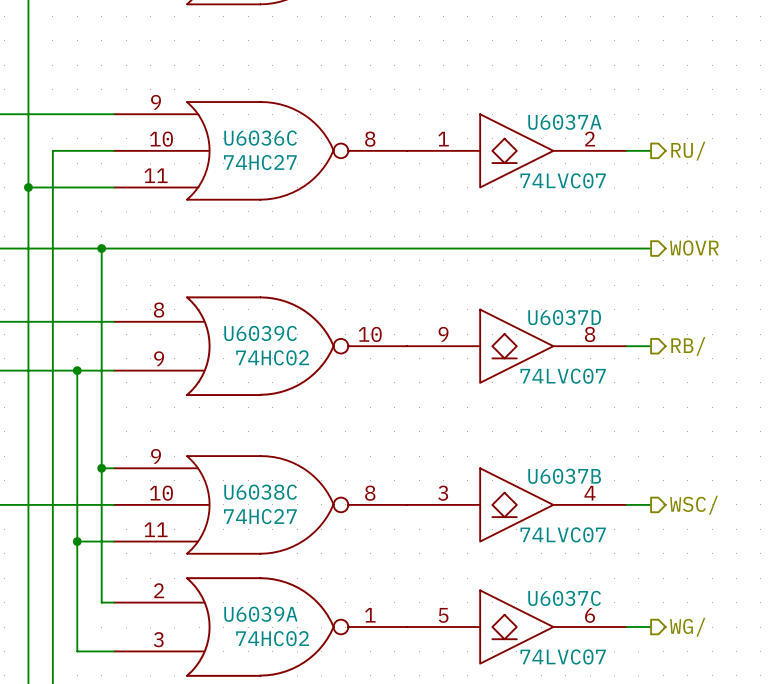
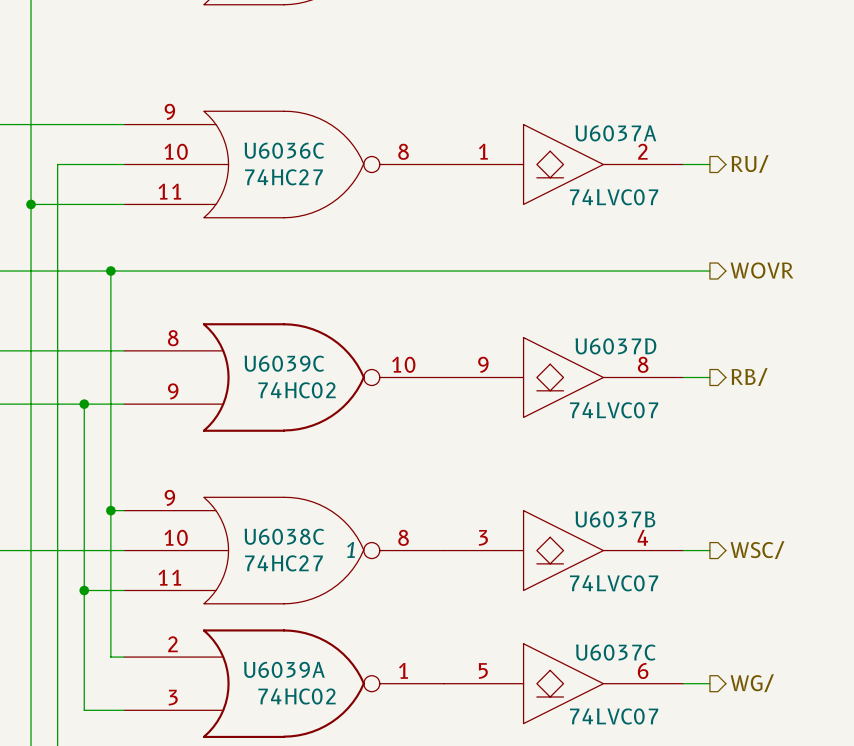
U6038C text: none -> 1 (351, 549)

